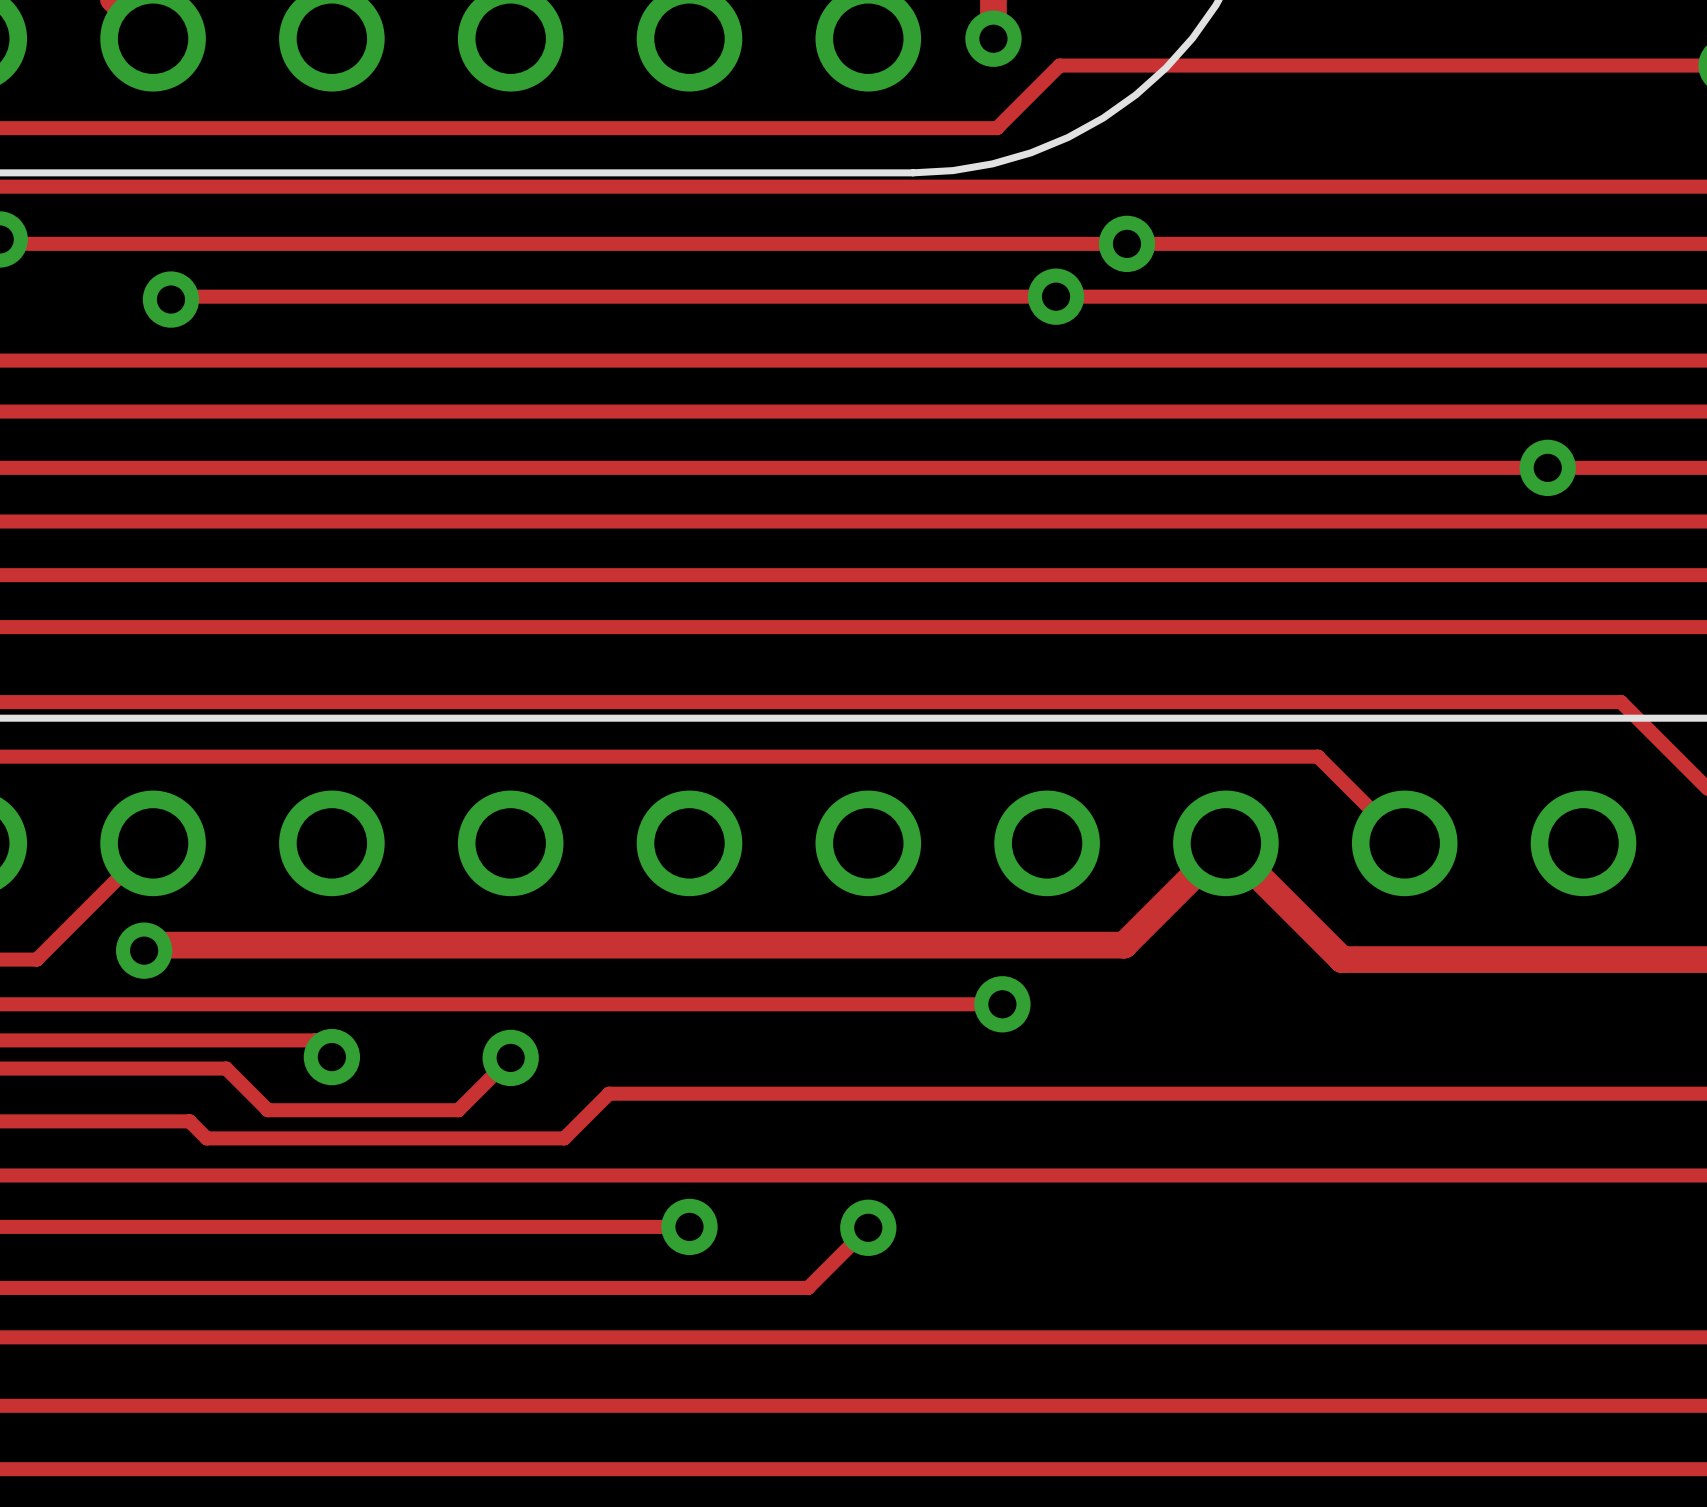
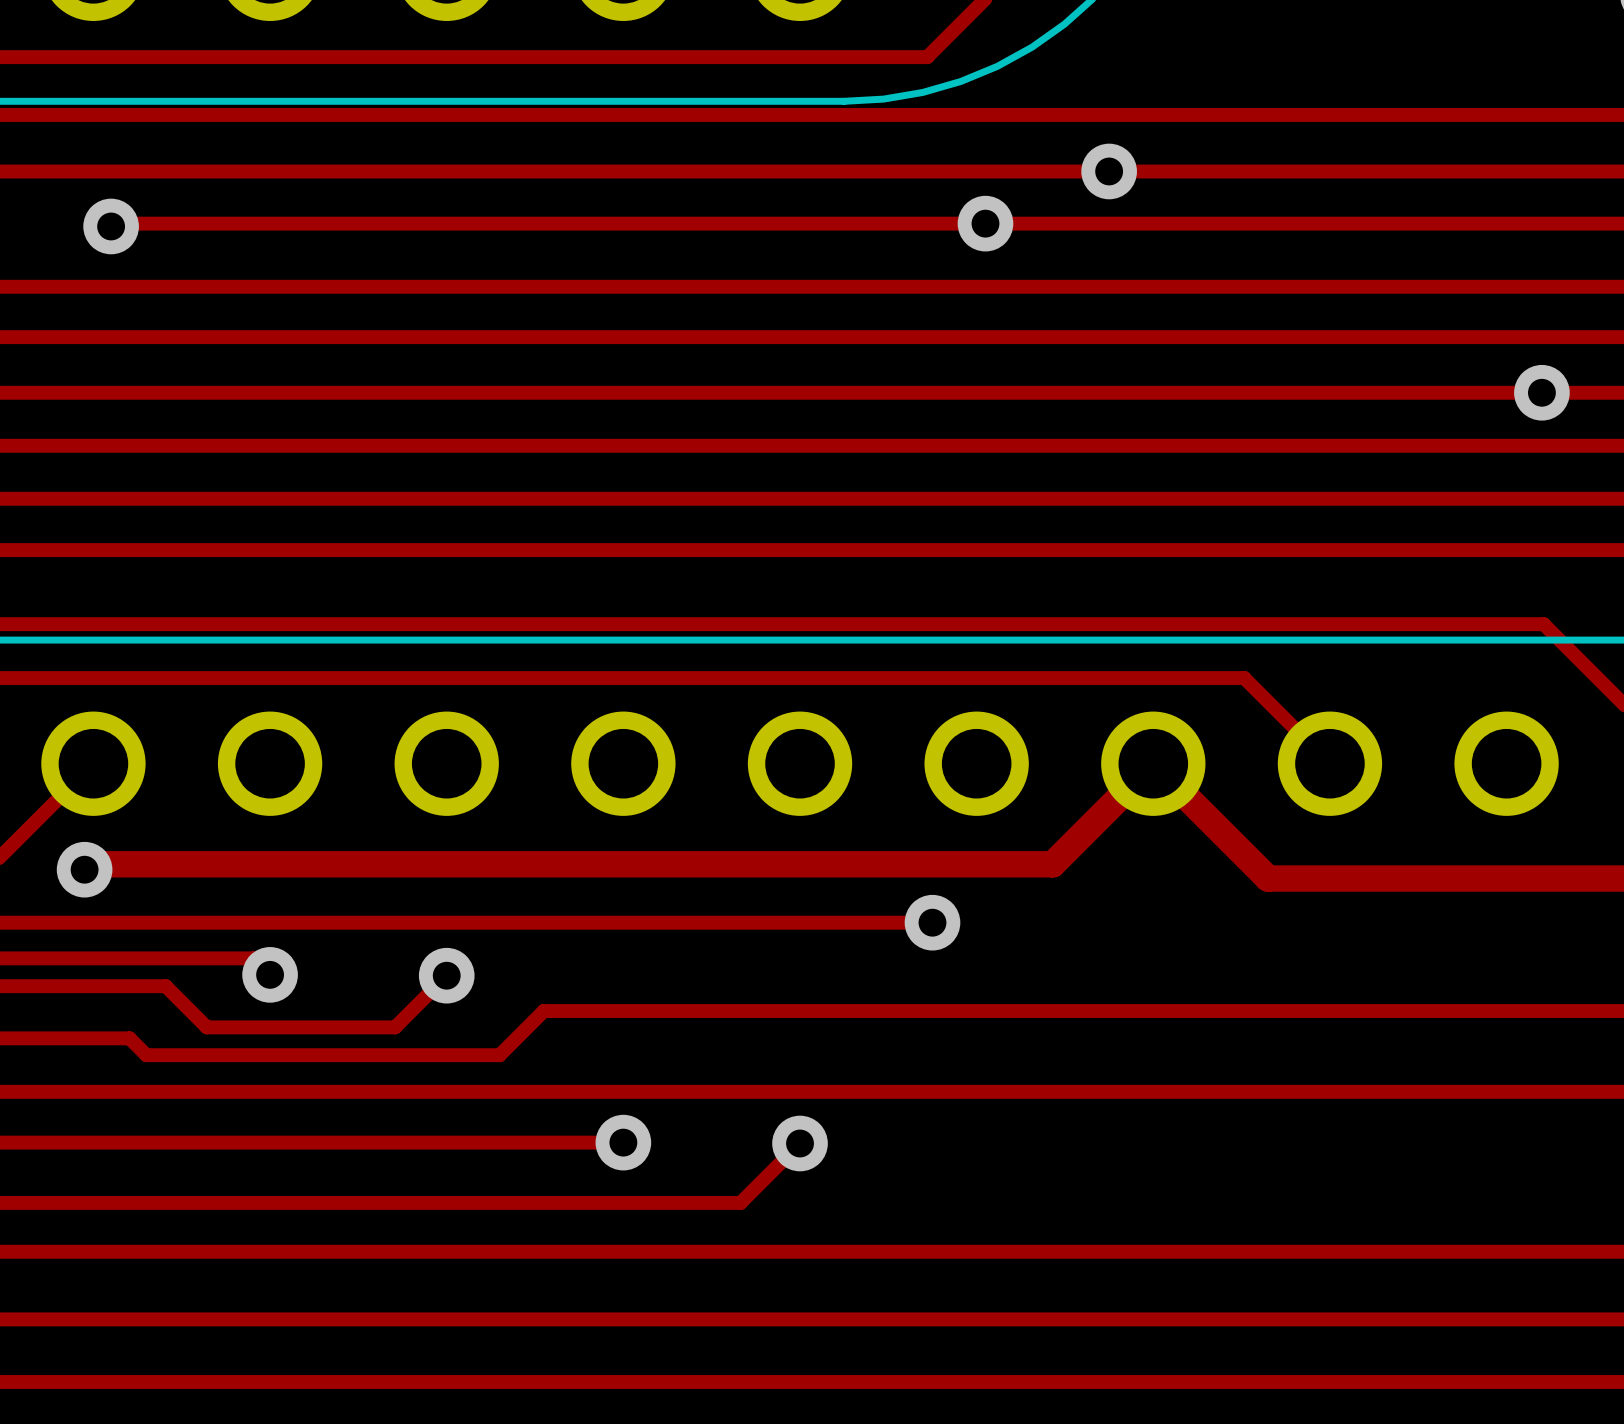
via position: (1126, 243) -> (1109, 171)
via position: (1547, 467) -> (1541, 392)

